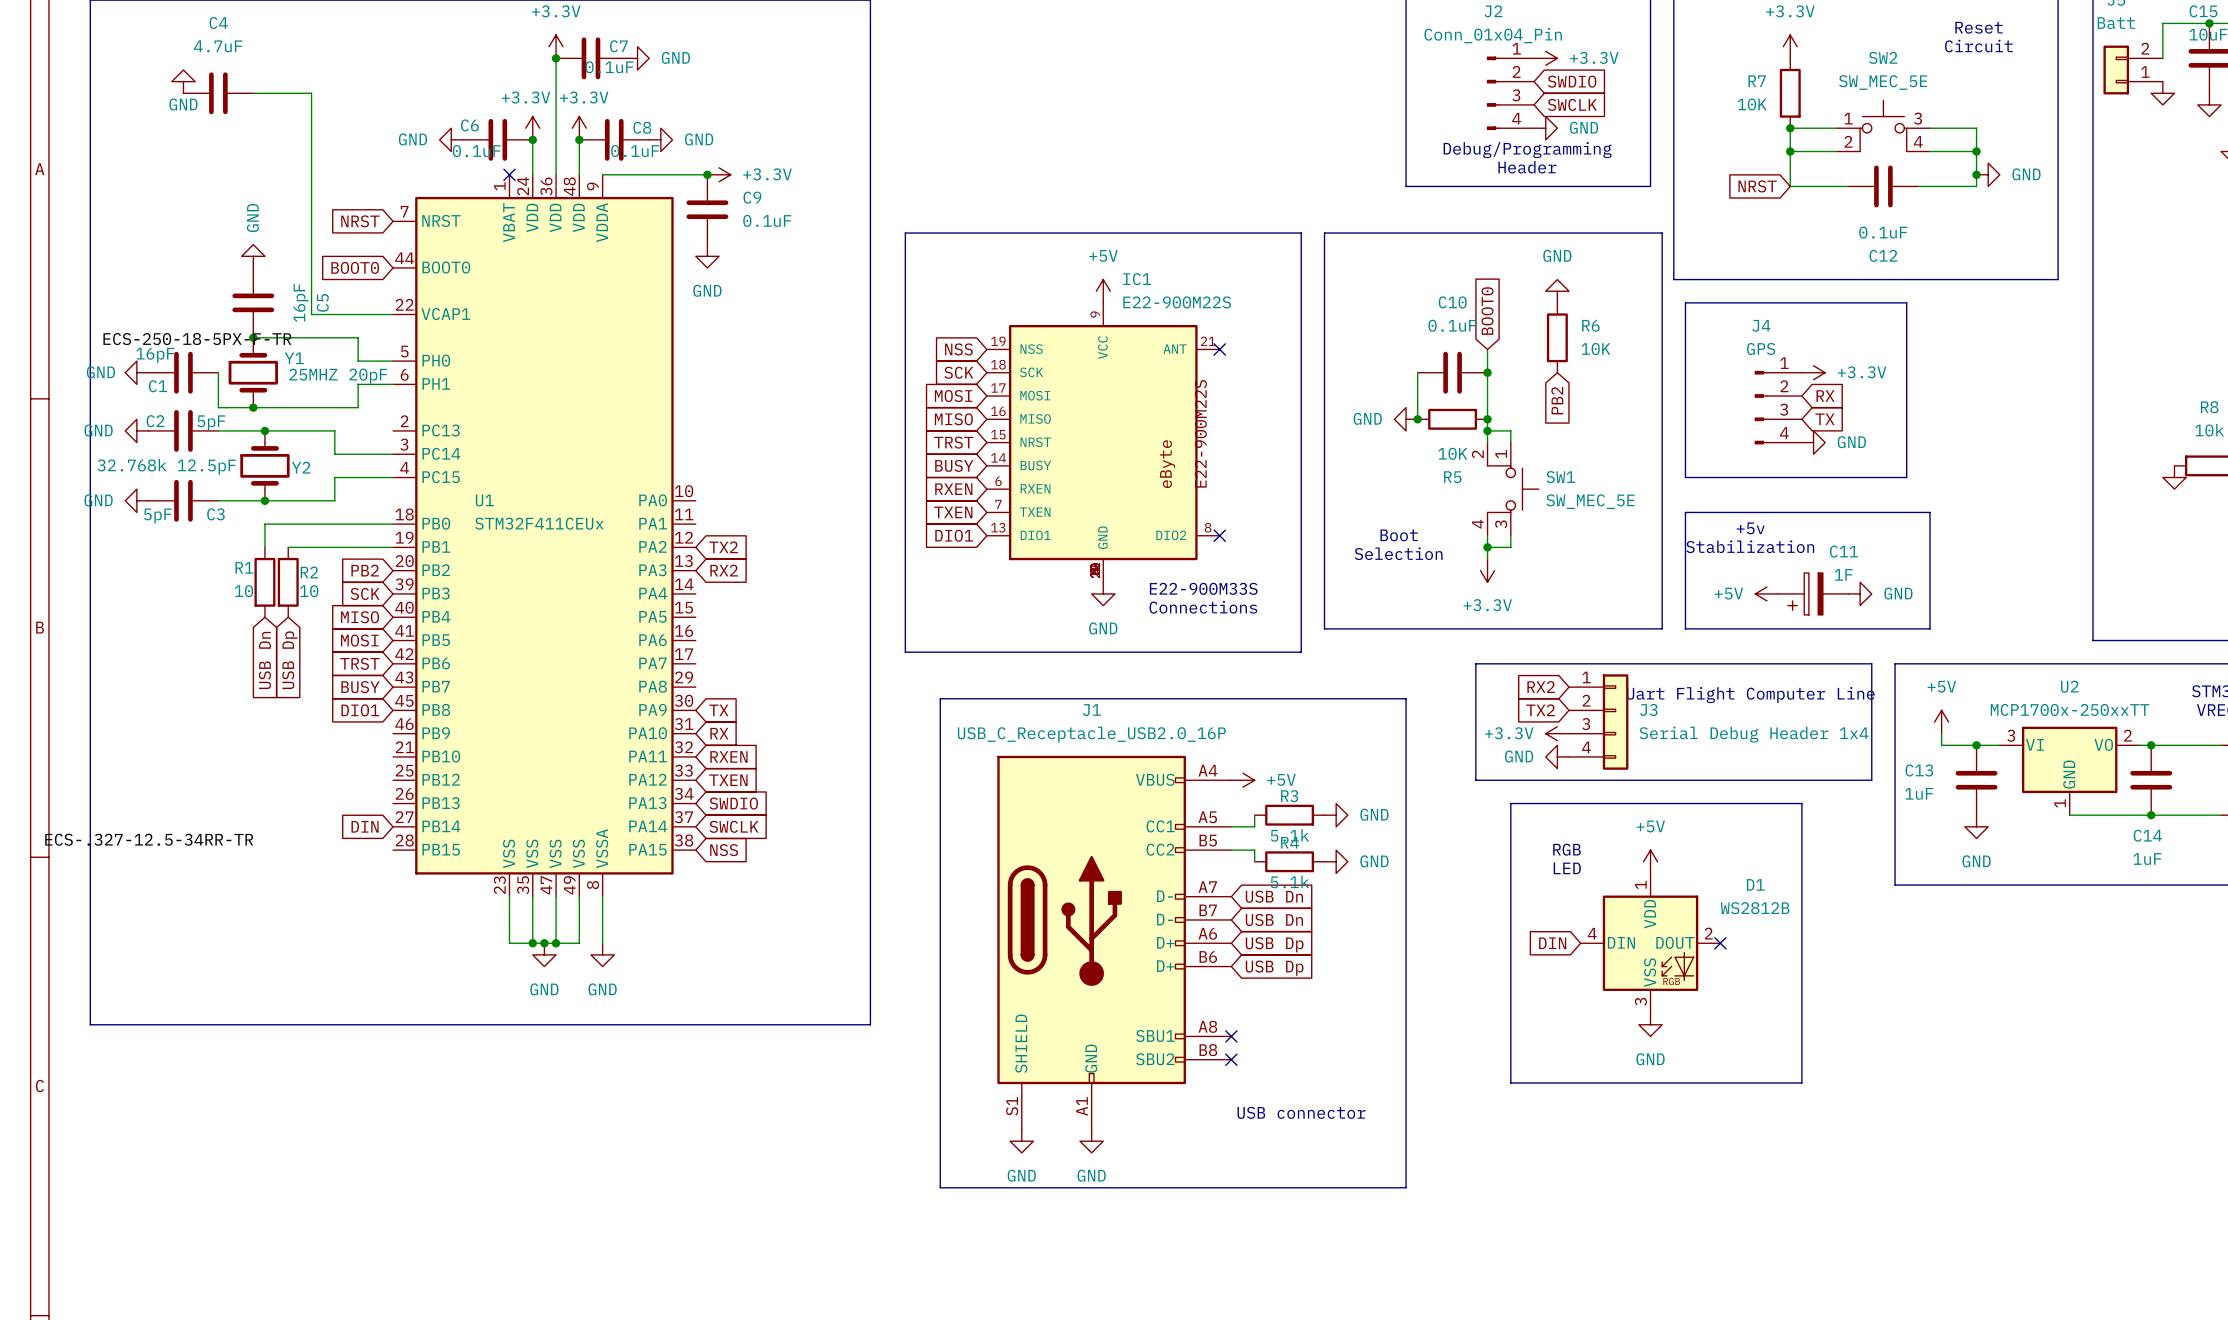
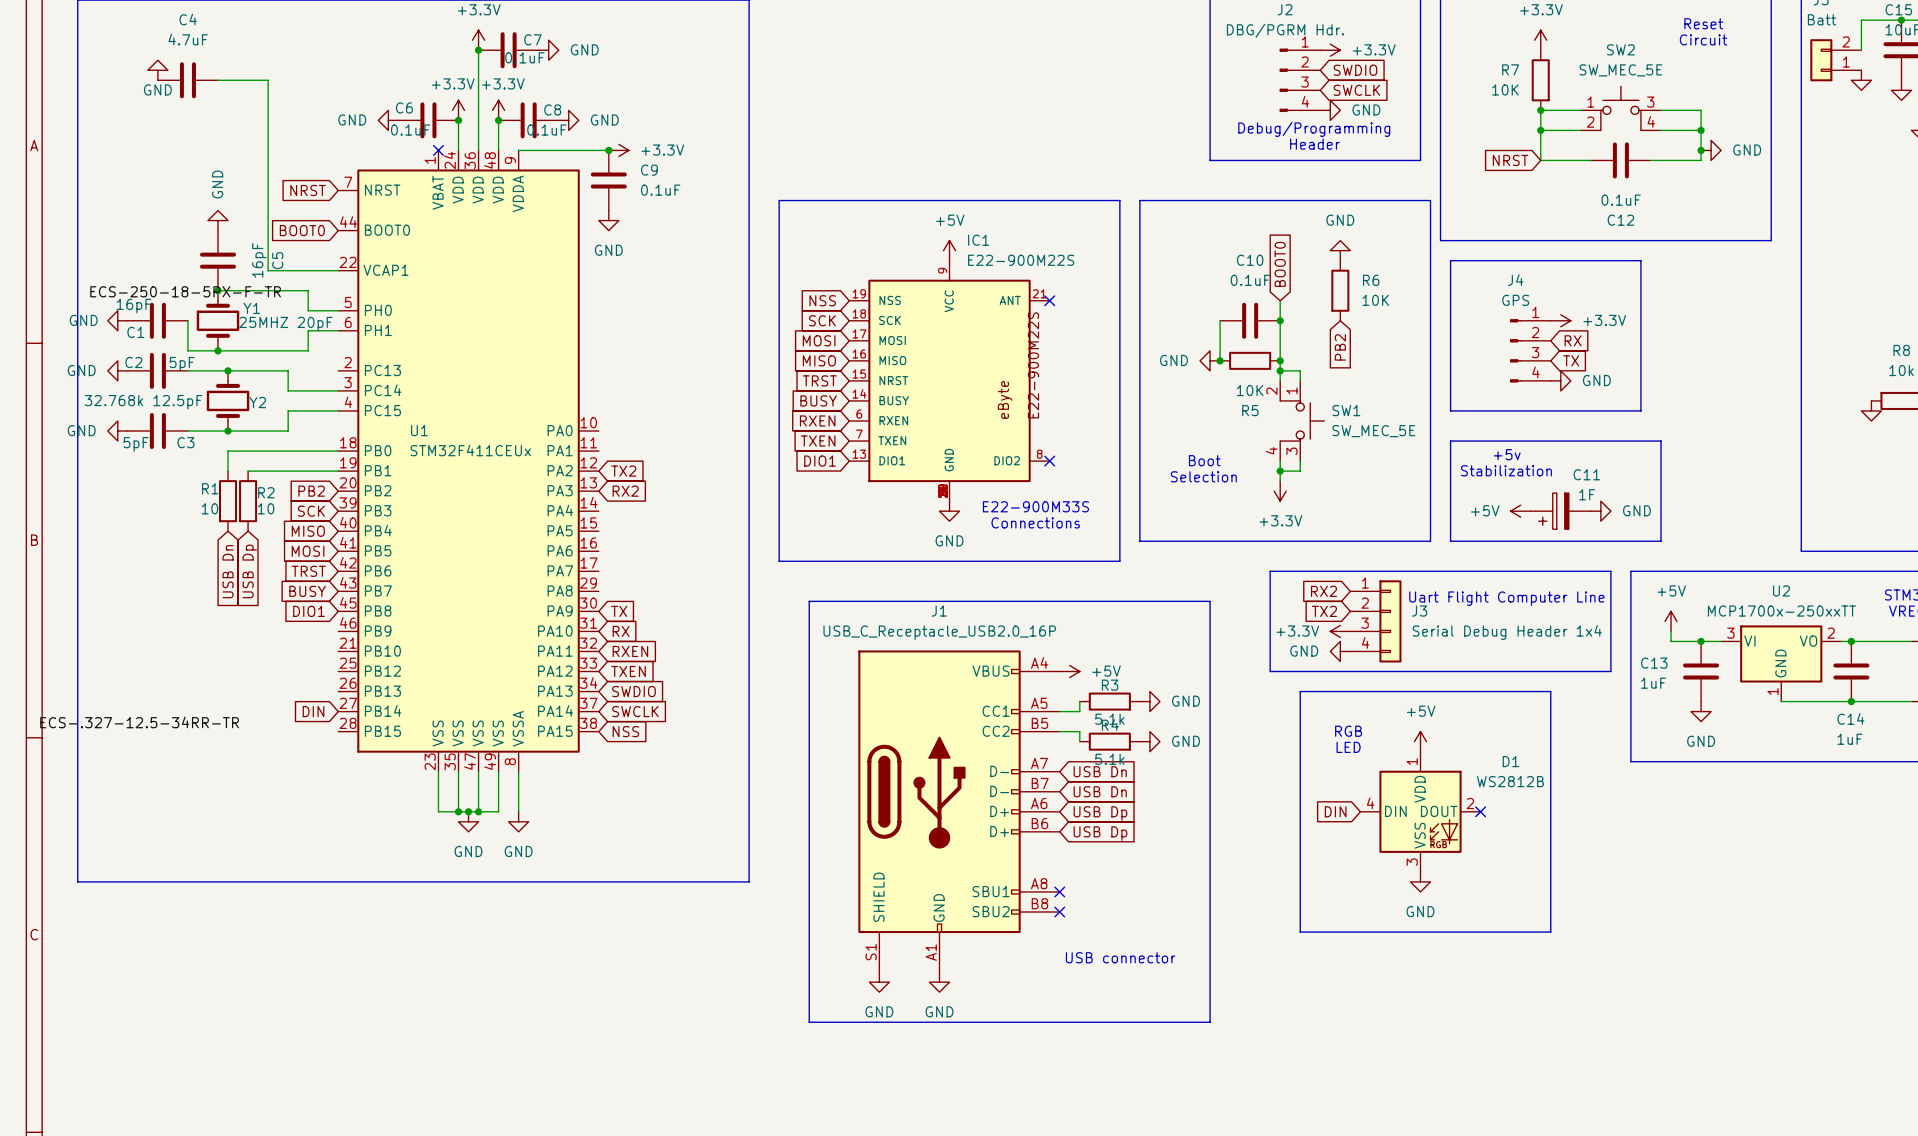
J2 value: Conn_01x04_Pin (1493, 35) -> DBG/PGRM Hdr. (1285, 30)

